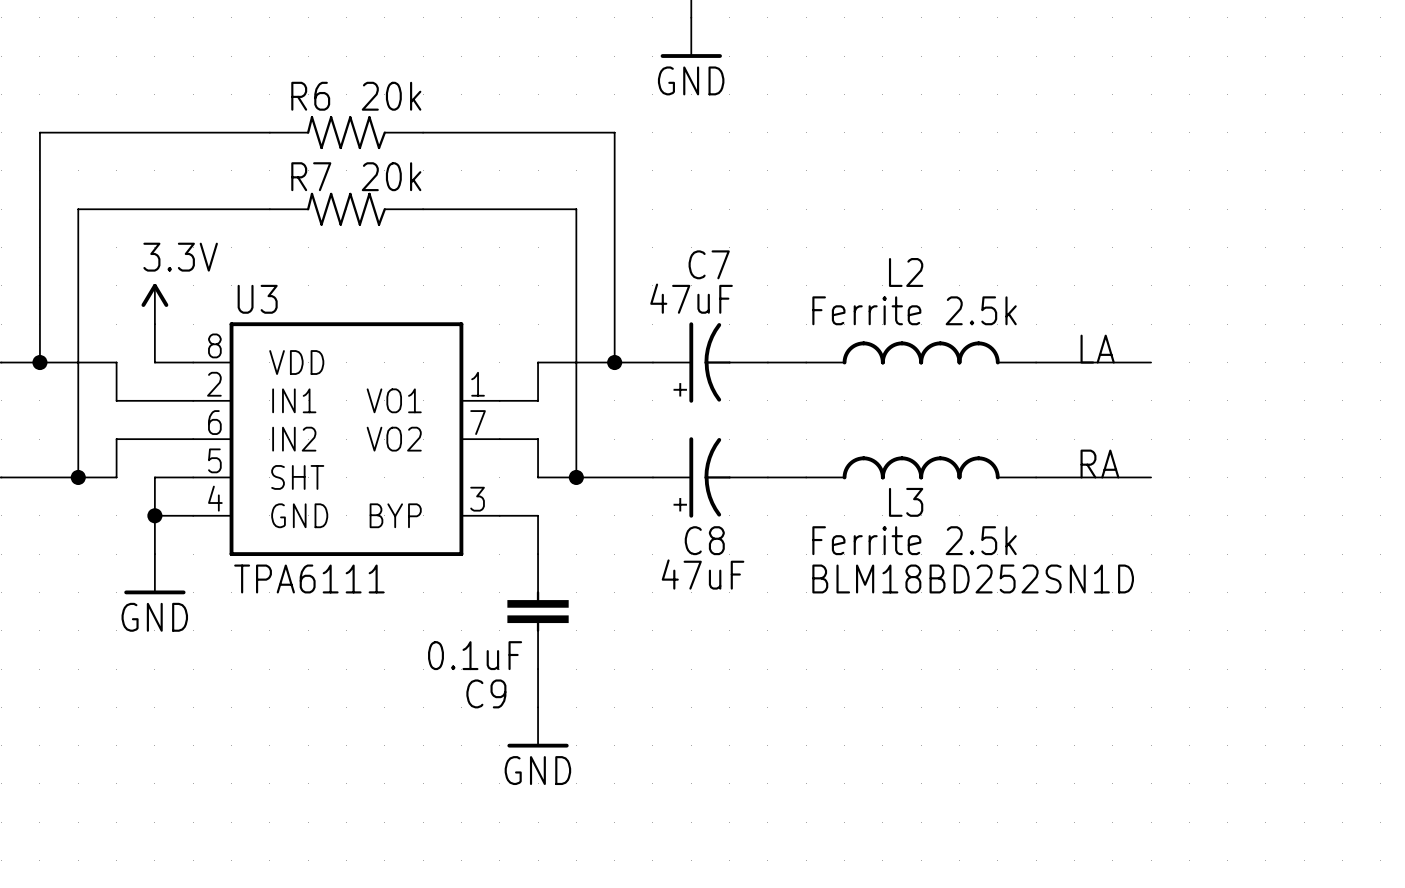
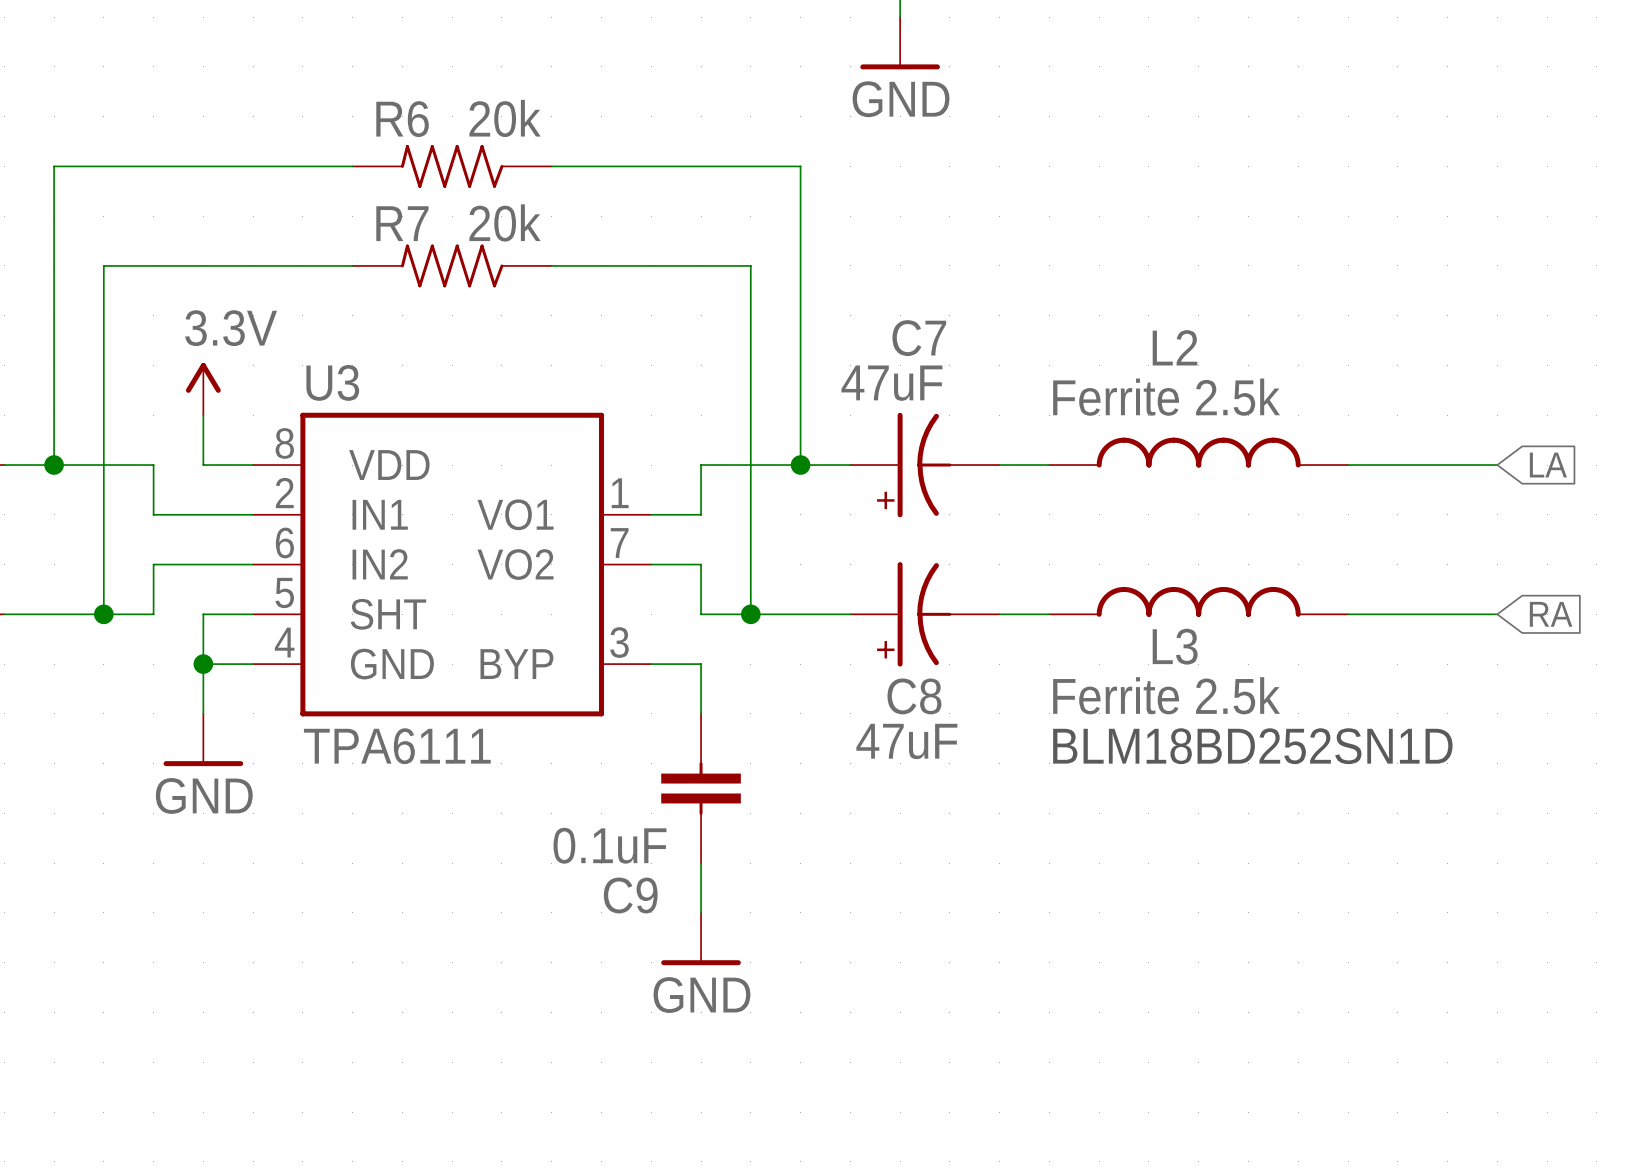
label: LA (1097, 349) -> none
global label: none -> LA (1548, 465)
label: RA (1099, 464) -> none
global label: none -> RA (1551, 614)

